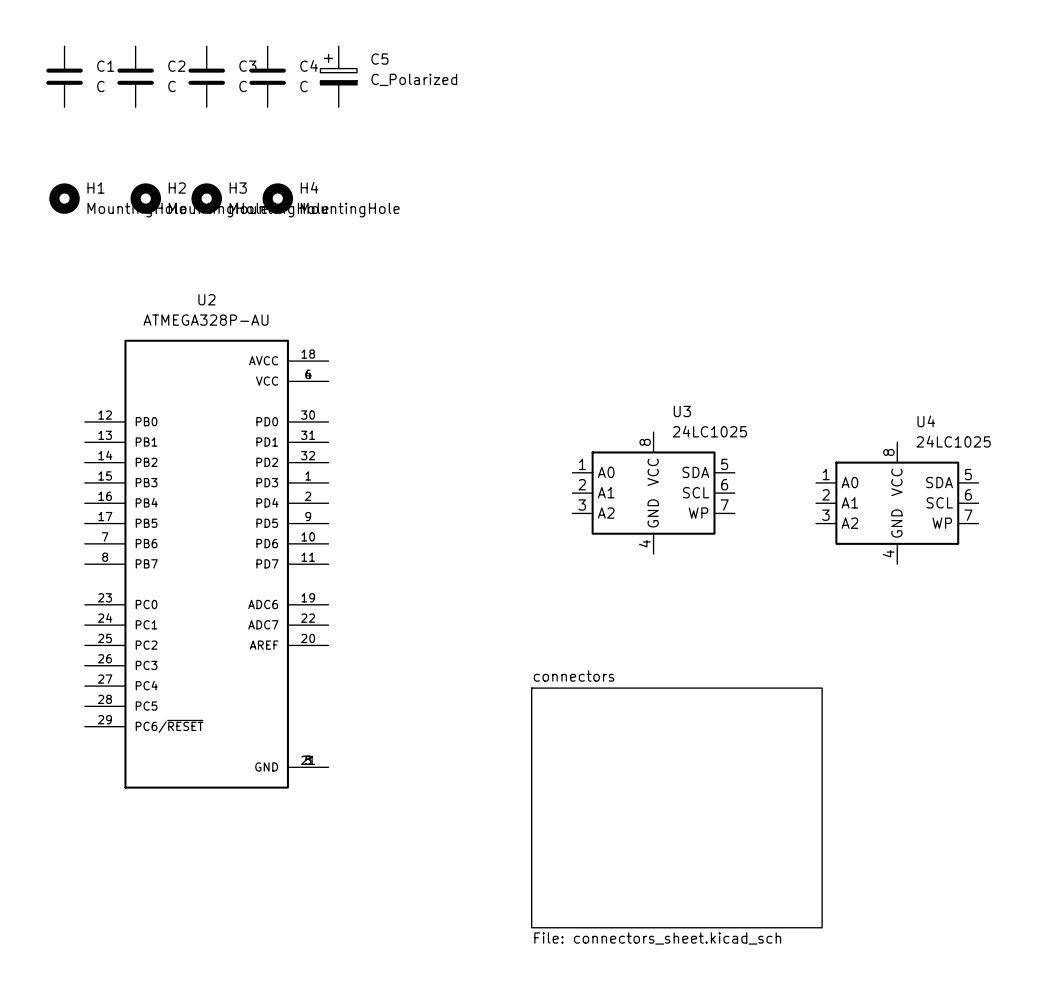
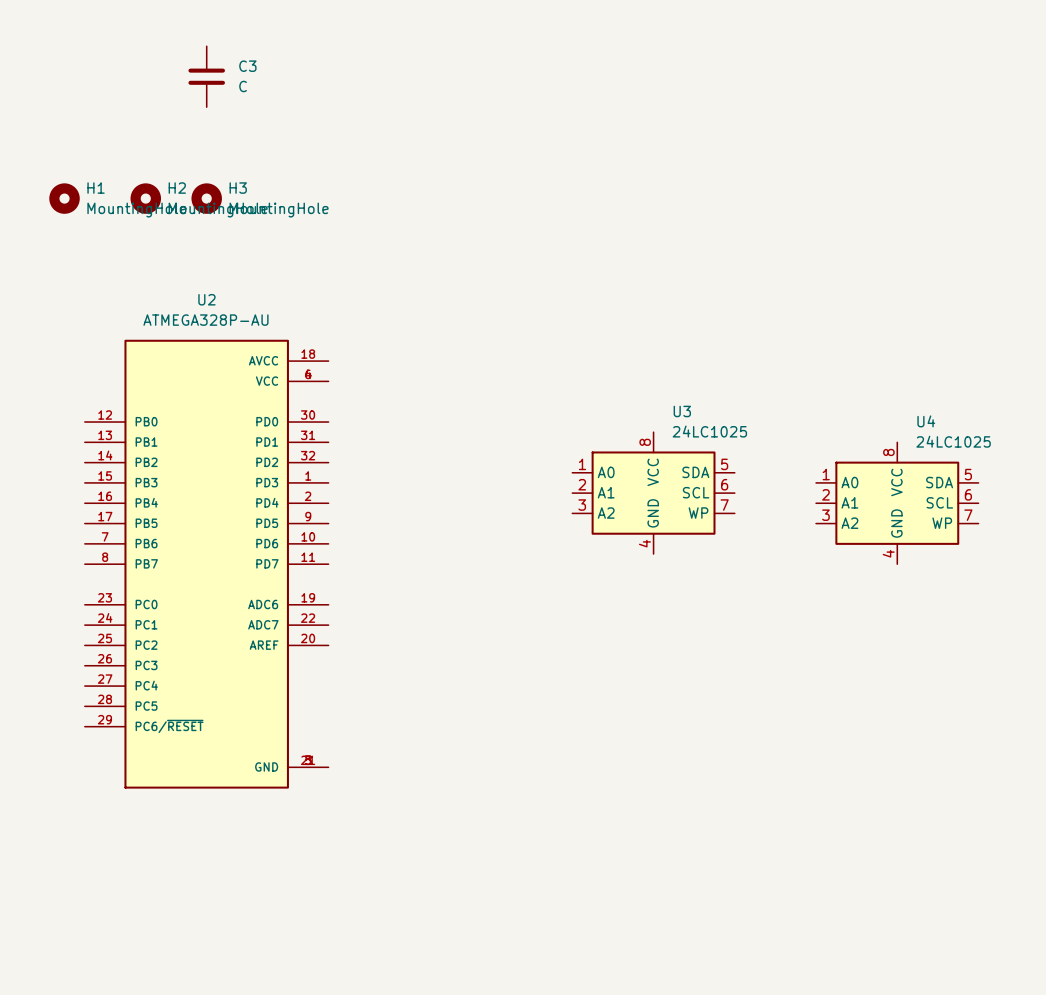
C1: C (64, 76) -> none
C2: C (135, 76) -> none
C4: C (267, 76) -> none
C5: C_Polarized (338, 76) -> none
H4: MountingHole (277, 198) -> none
sheet connectors: File: connectors_sheet.kicad_sch (676, 807) -> none

